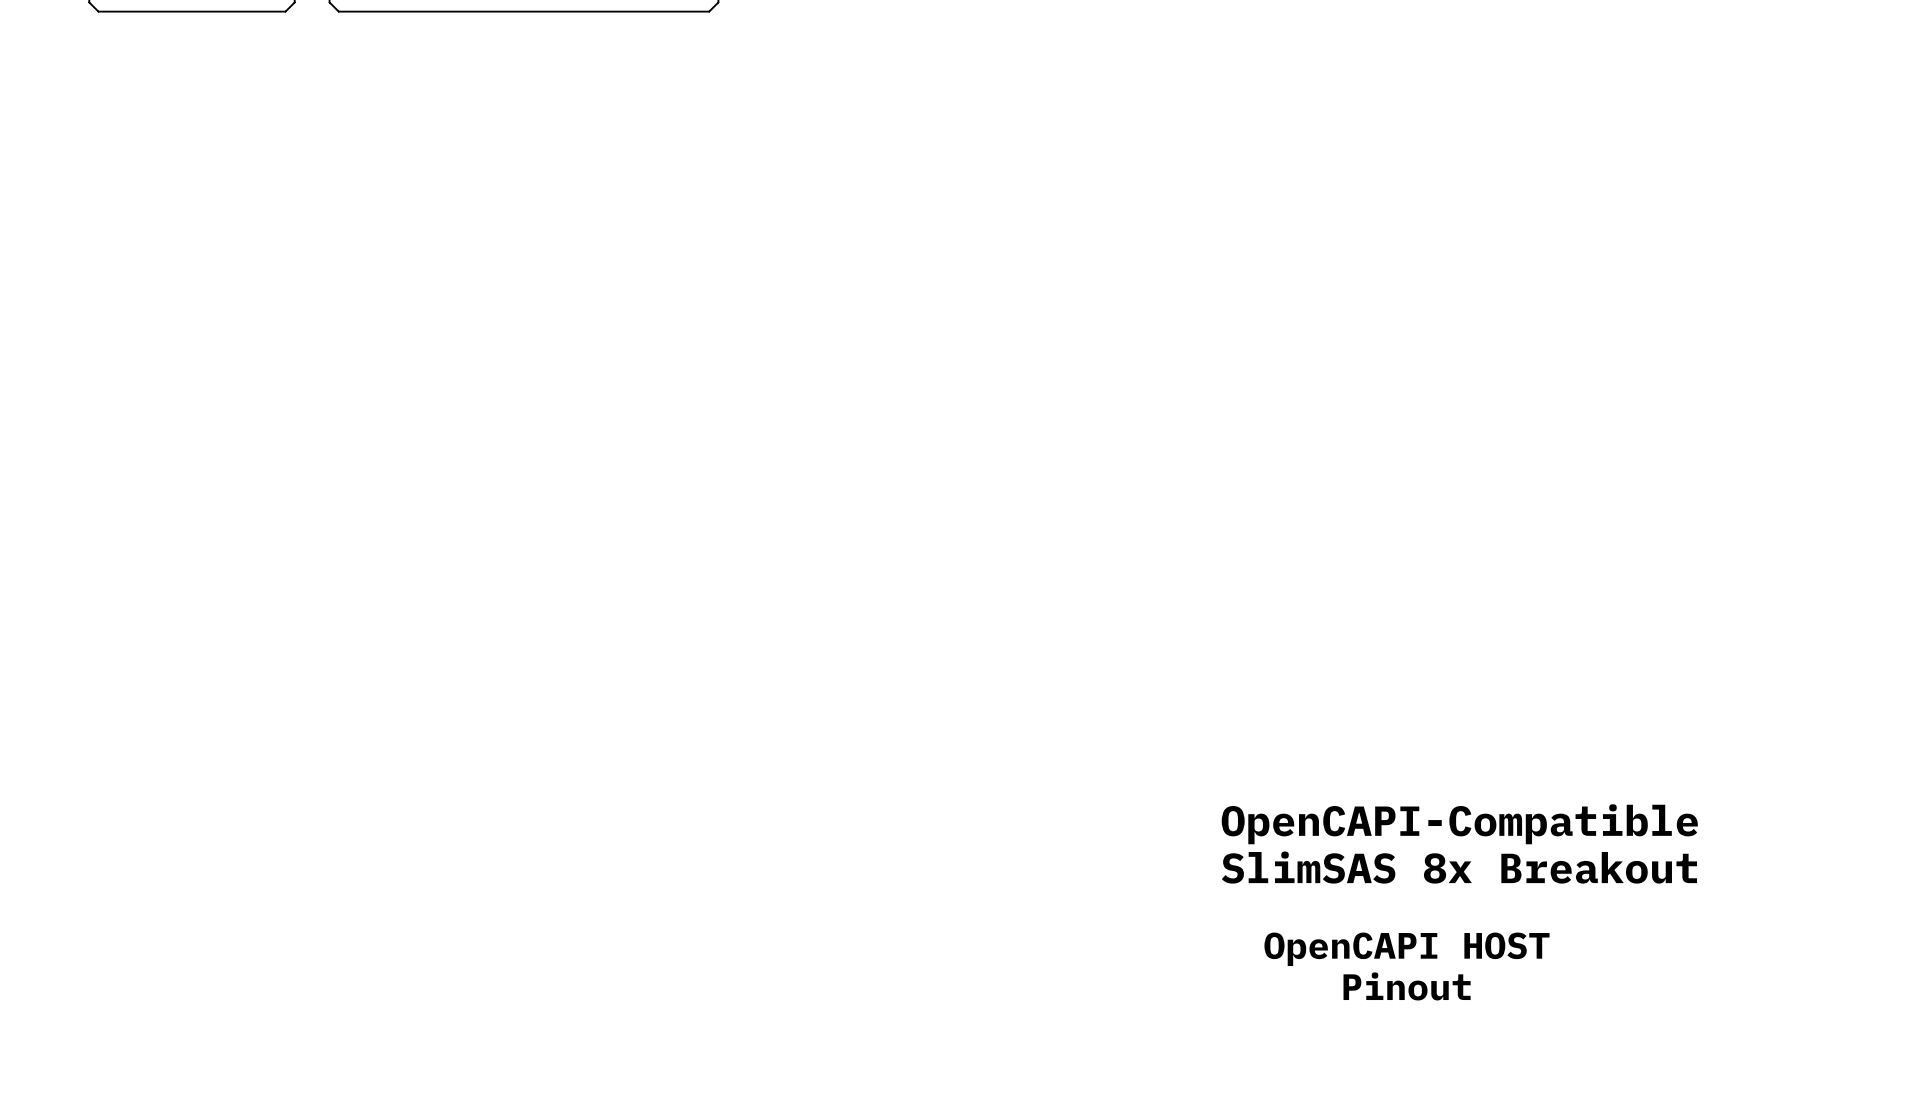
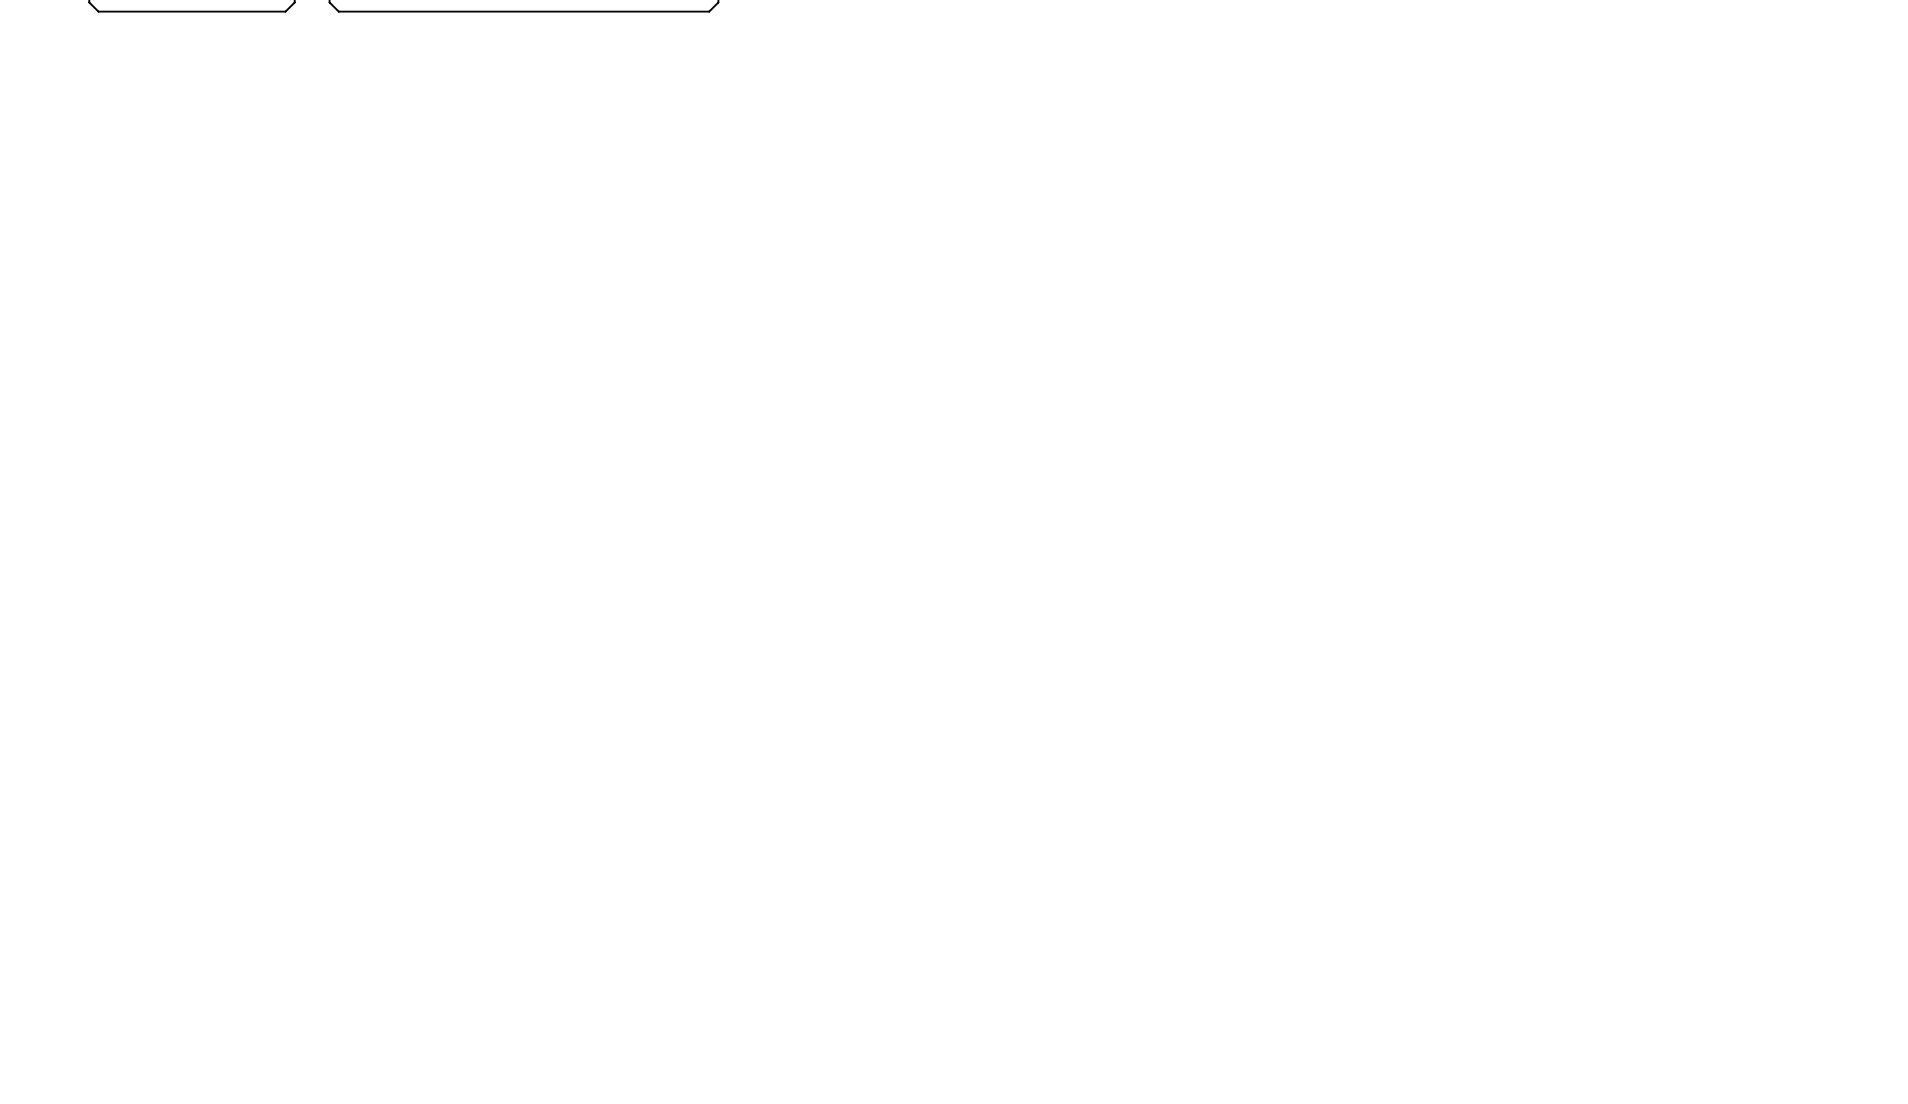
text: OpenCAPI-Compatible (1459, 824) -> none
text: SlimSAS 8x Breakout (1459, 867) -> none
text: OpenCAPI HOST (1407, 949) -> none
text: Pinout (1407, 986) -> none

